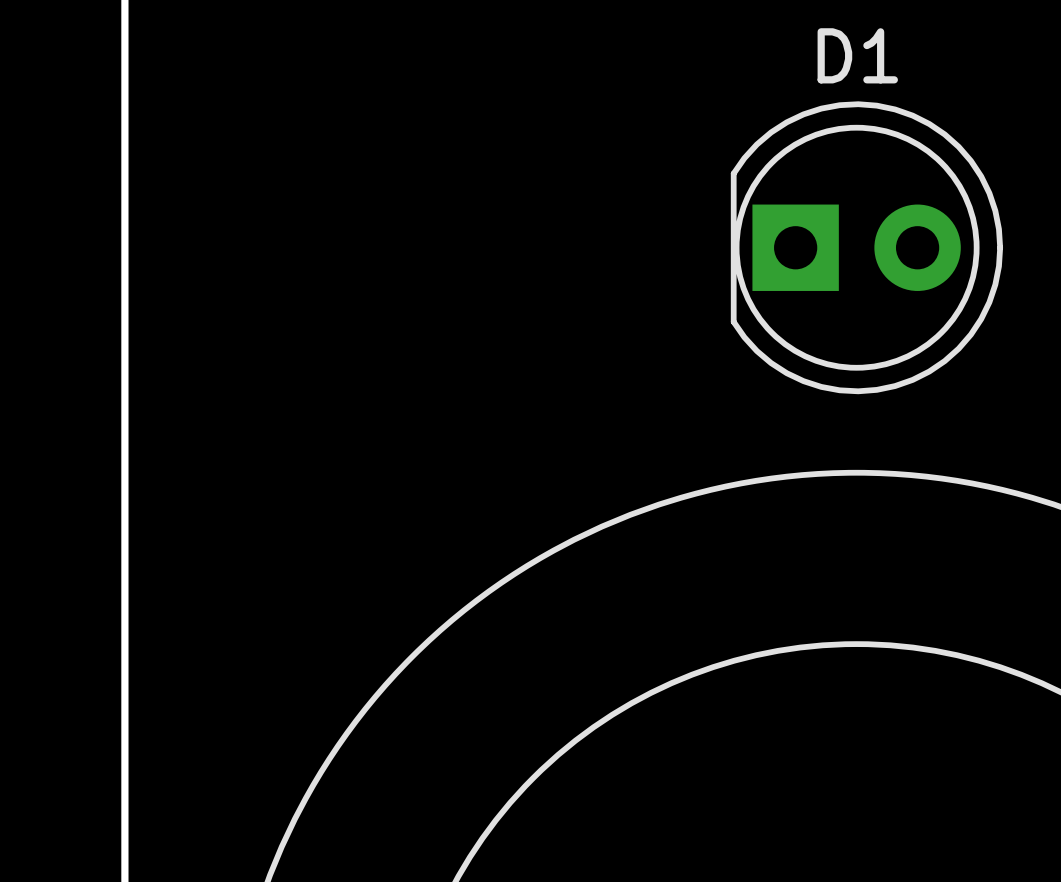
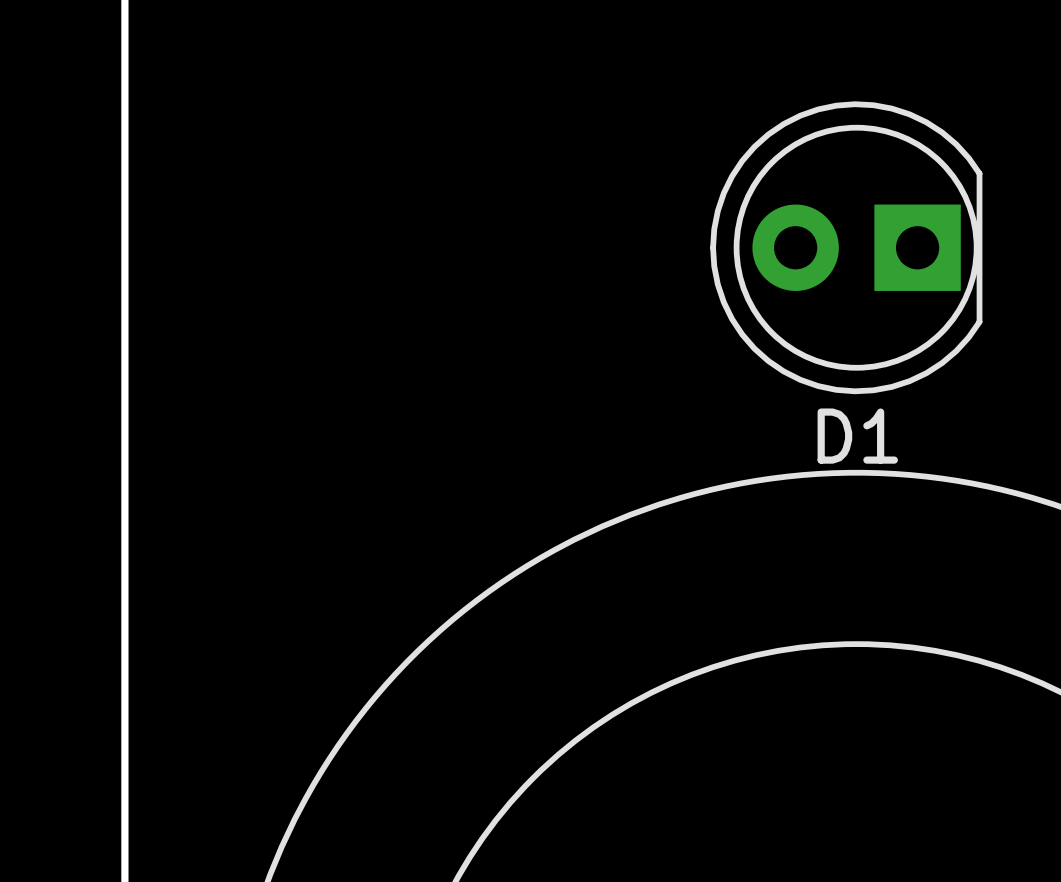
D1 rotation: 0° (866, 247) -> 180° (846, 247)

